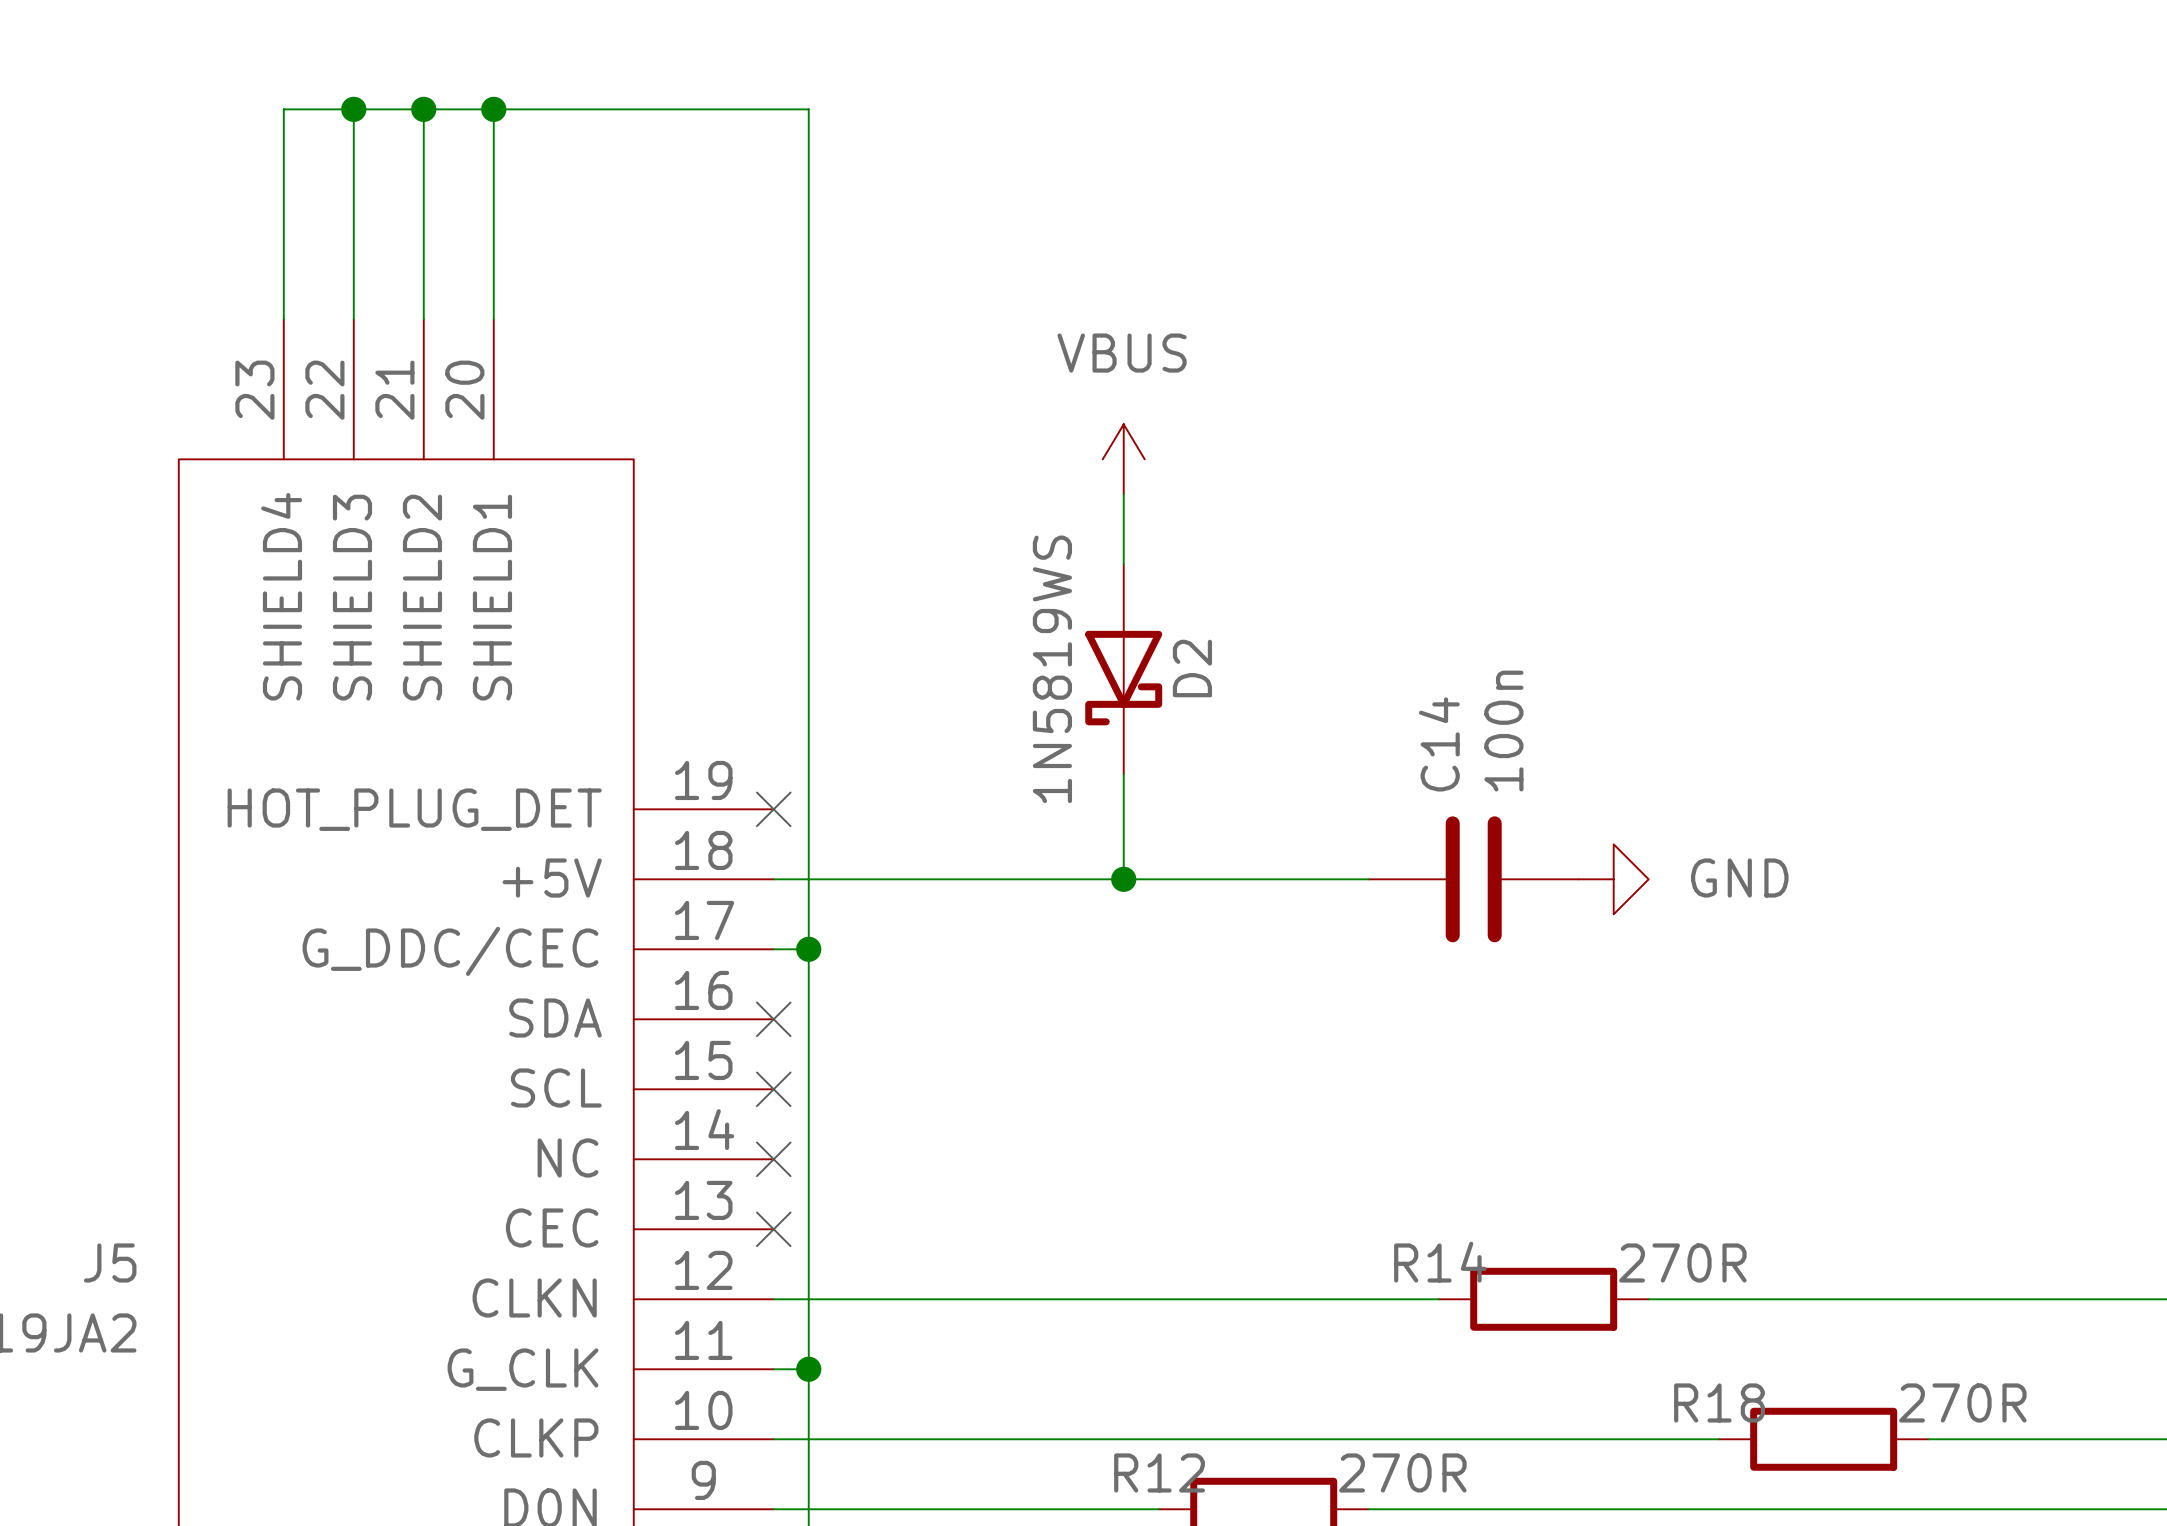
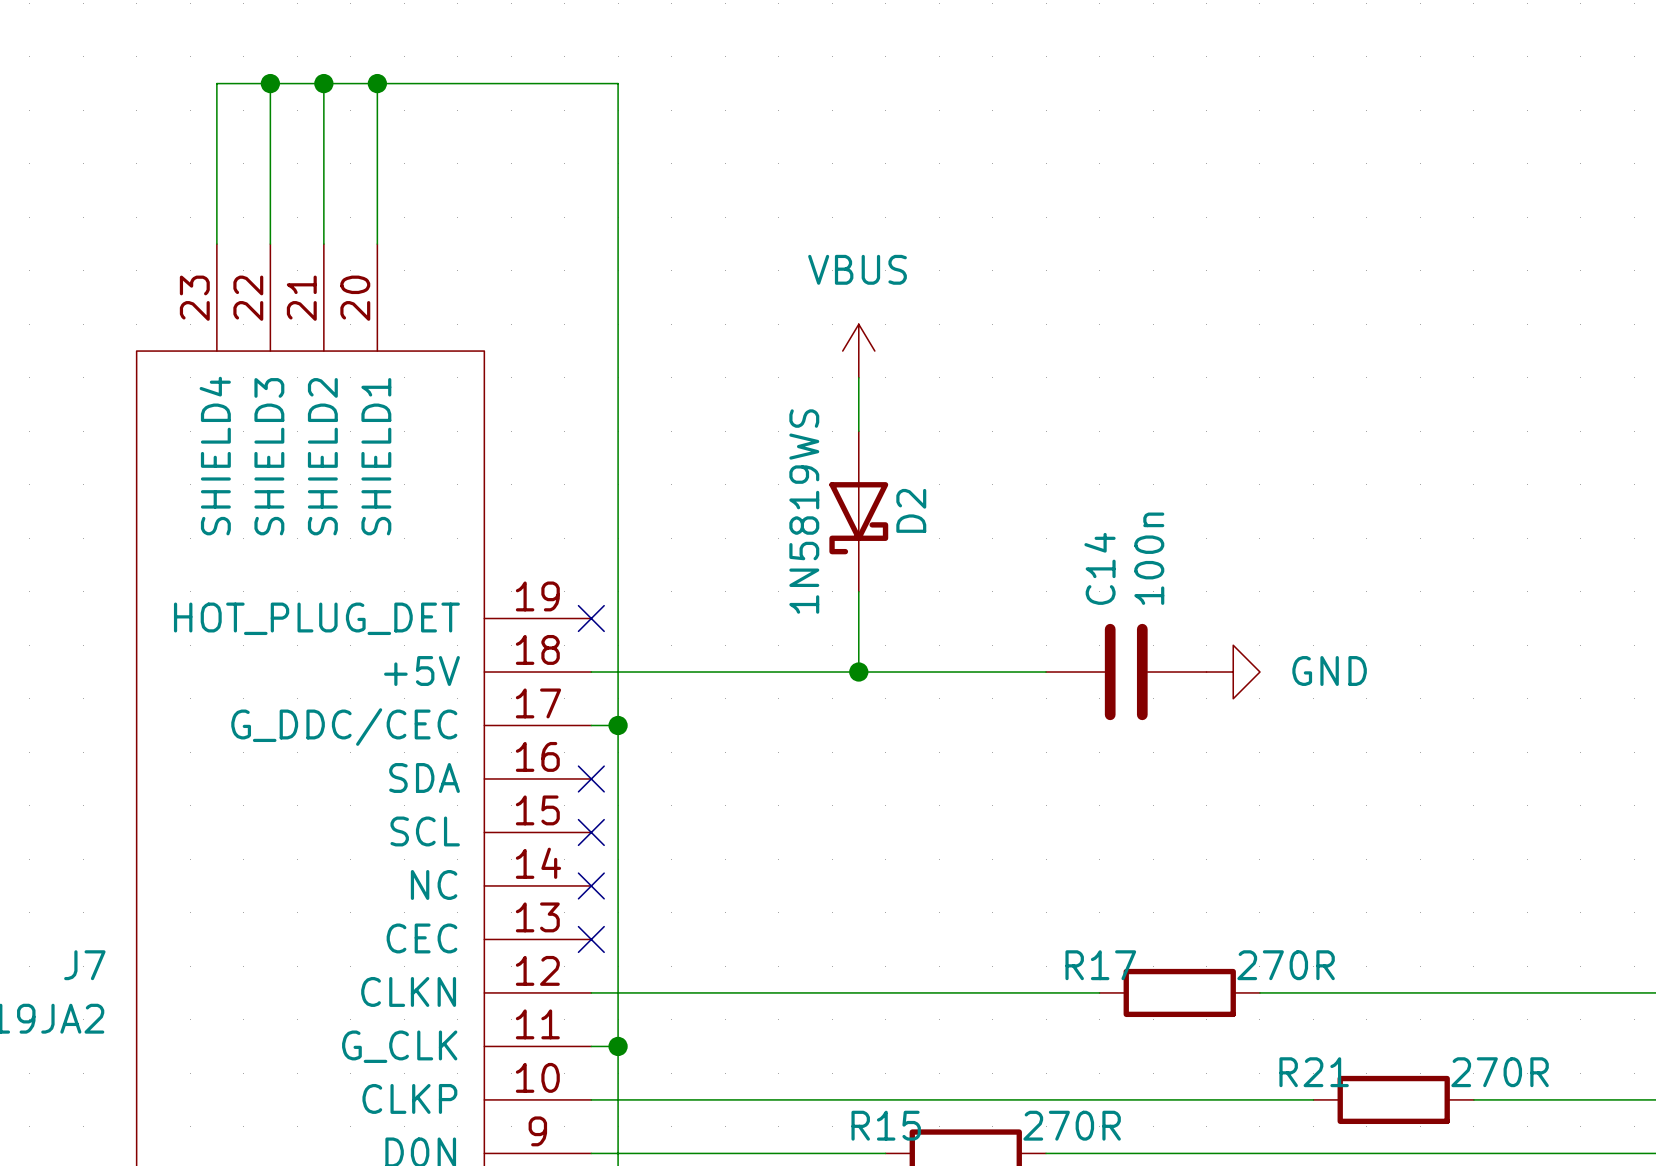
J5 name: J5 (110, 1262) -> J7 (84, 965)
R14 name: R14 (1440, 1262) -> R17 (1100, 965)
R18 name: R18 (1719, 1402) -> R21 (1314, 1072)
R12 name: R12 (1159, 1472) -> R15 (886, 1125)

